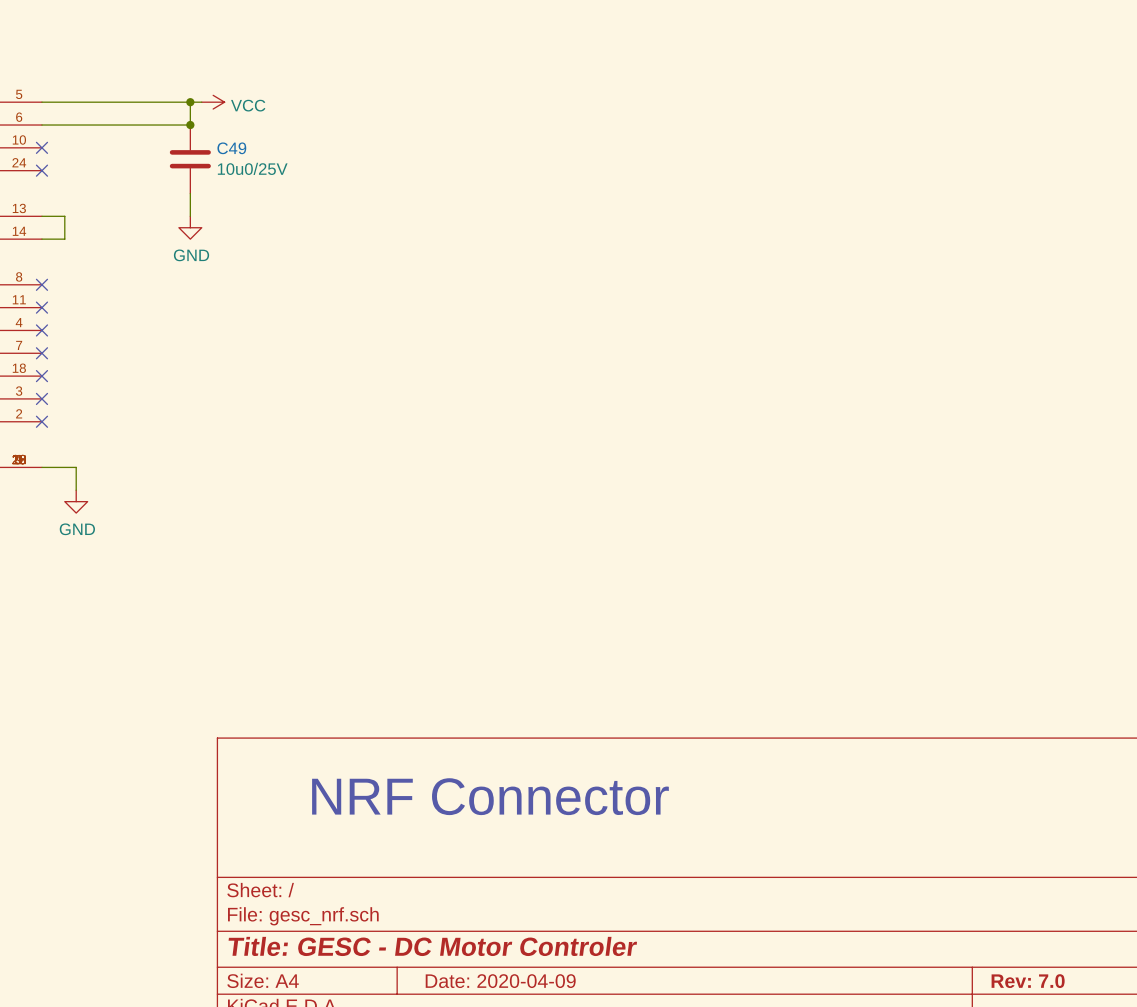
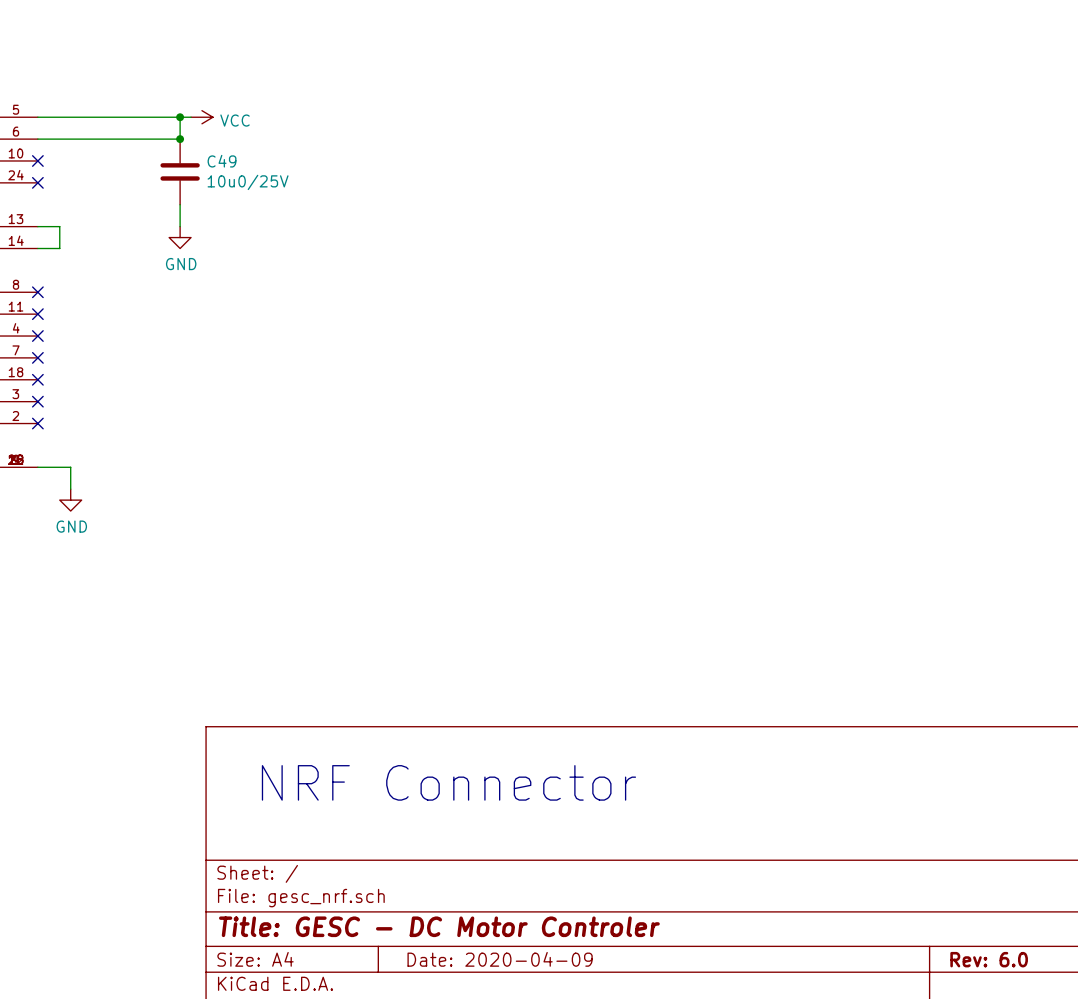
title block: Rev: 7.0 (1028, 981) -> Rev: 6.0 (989, 959)

